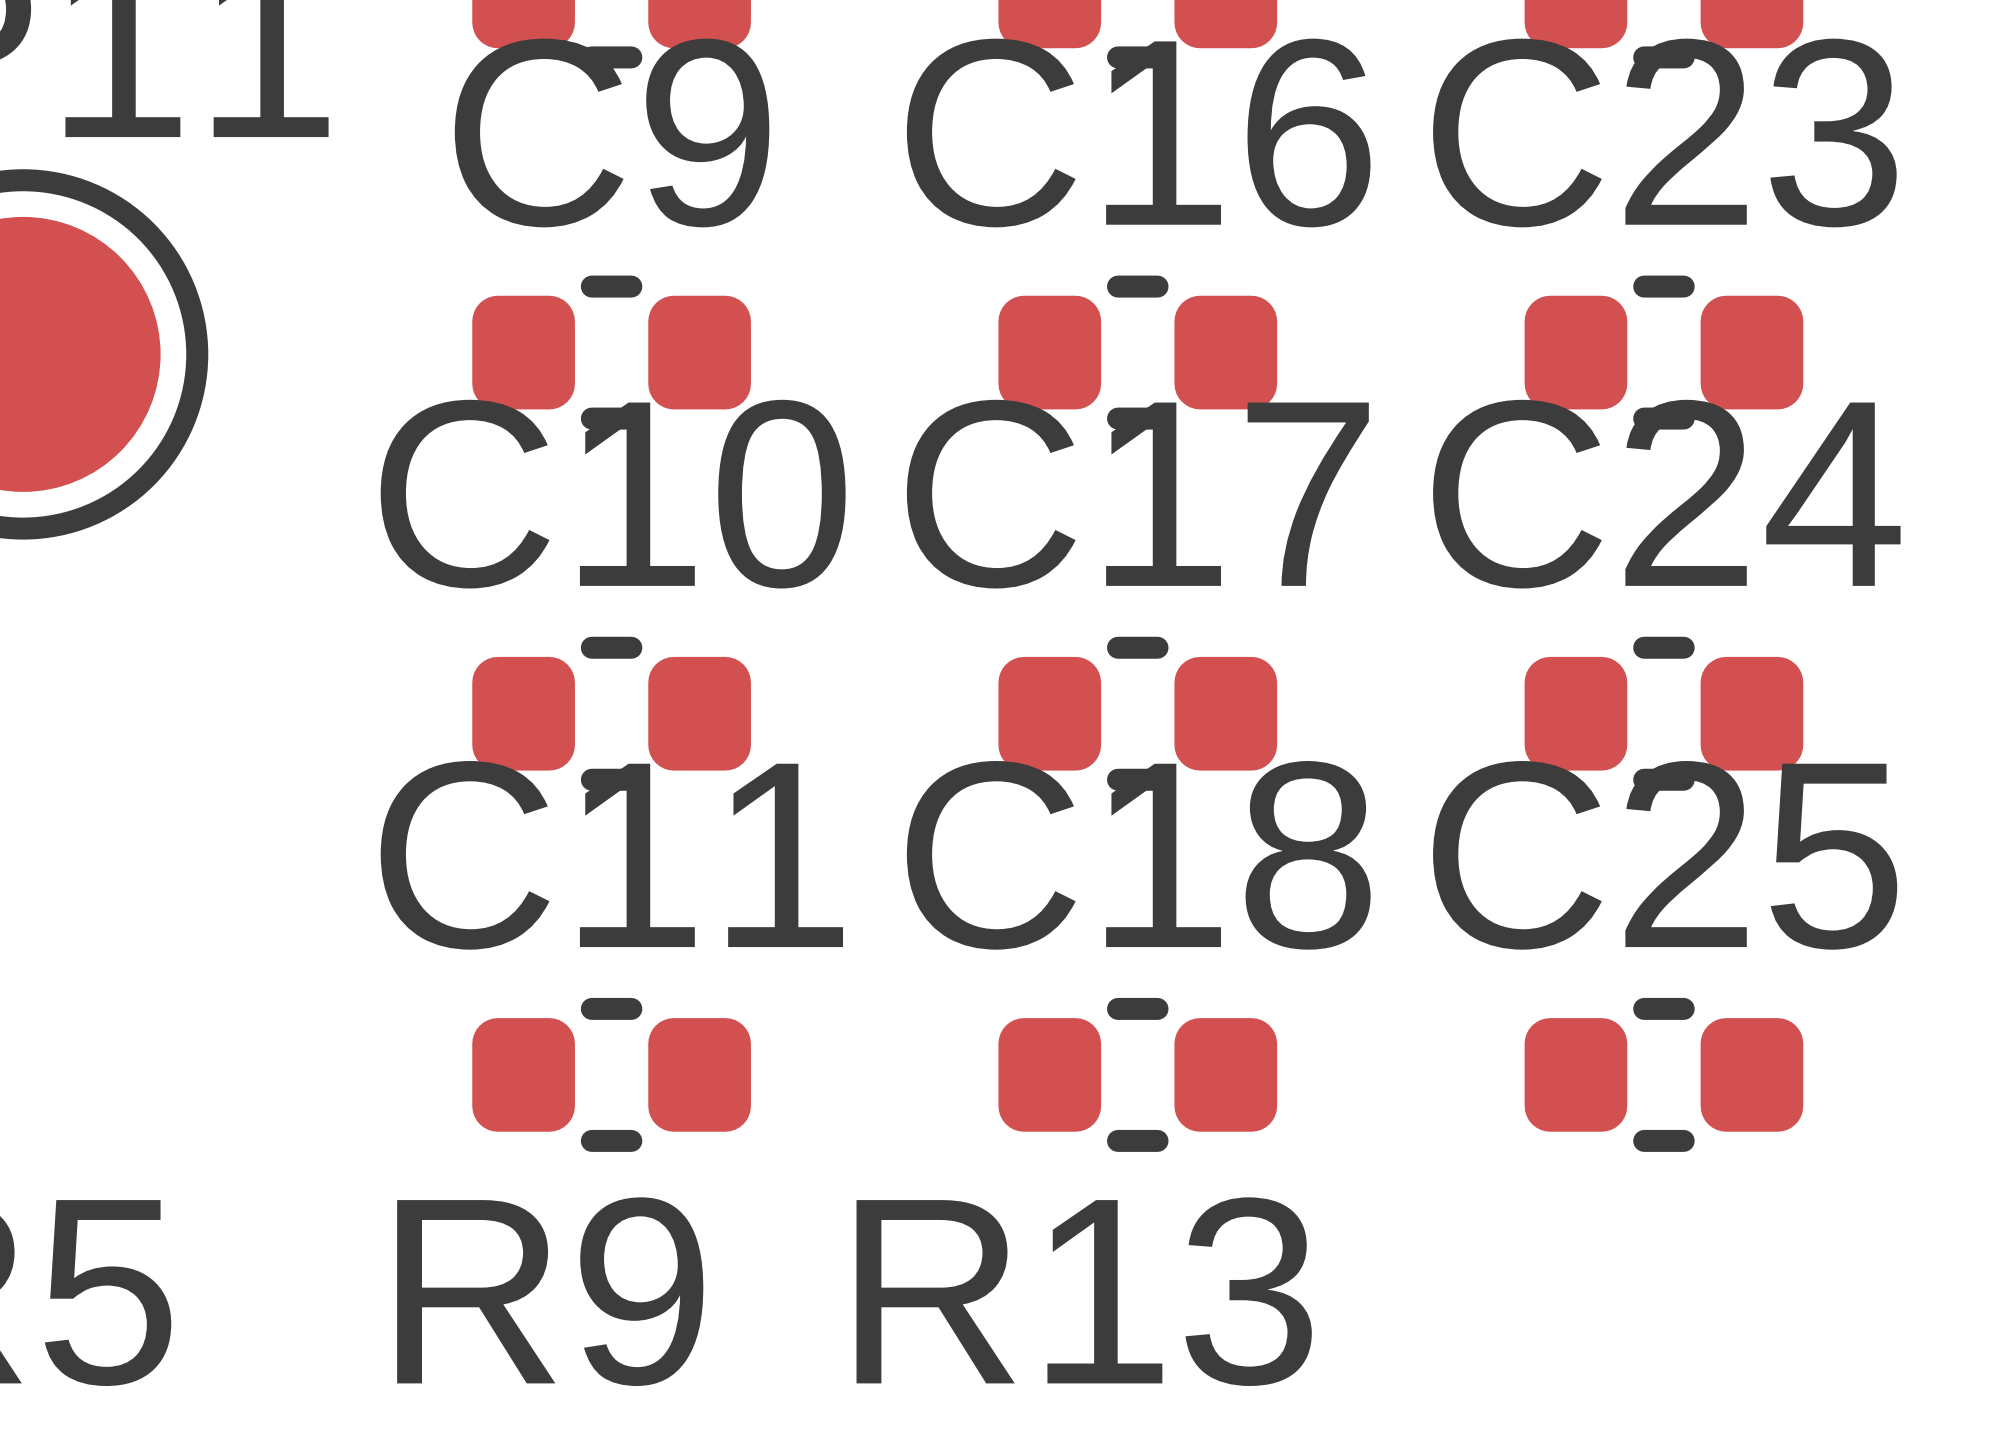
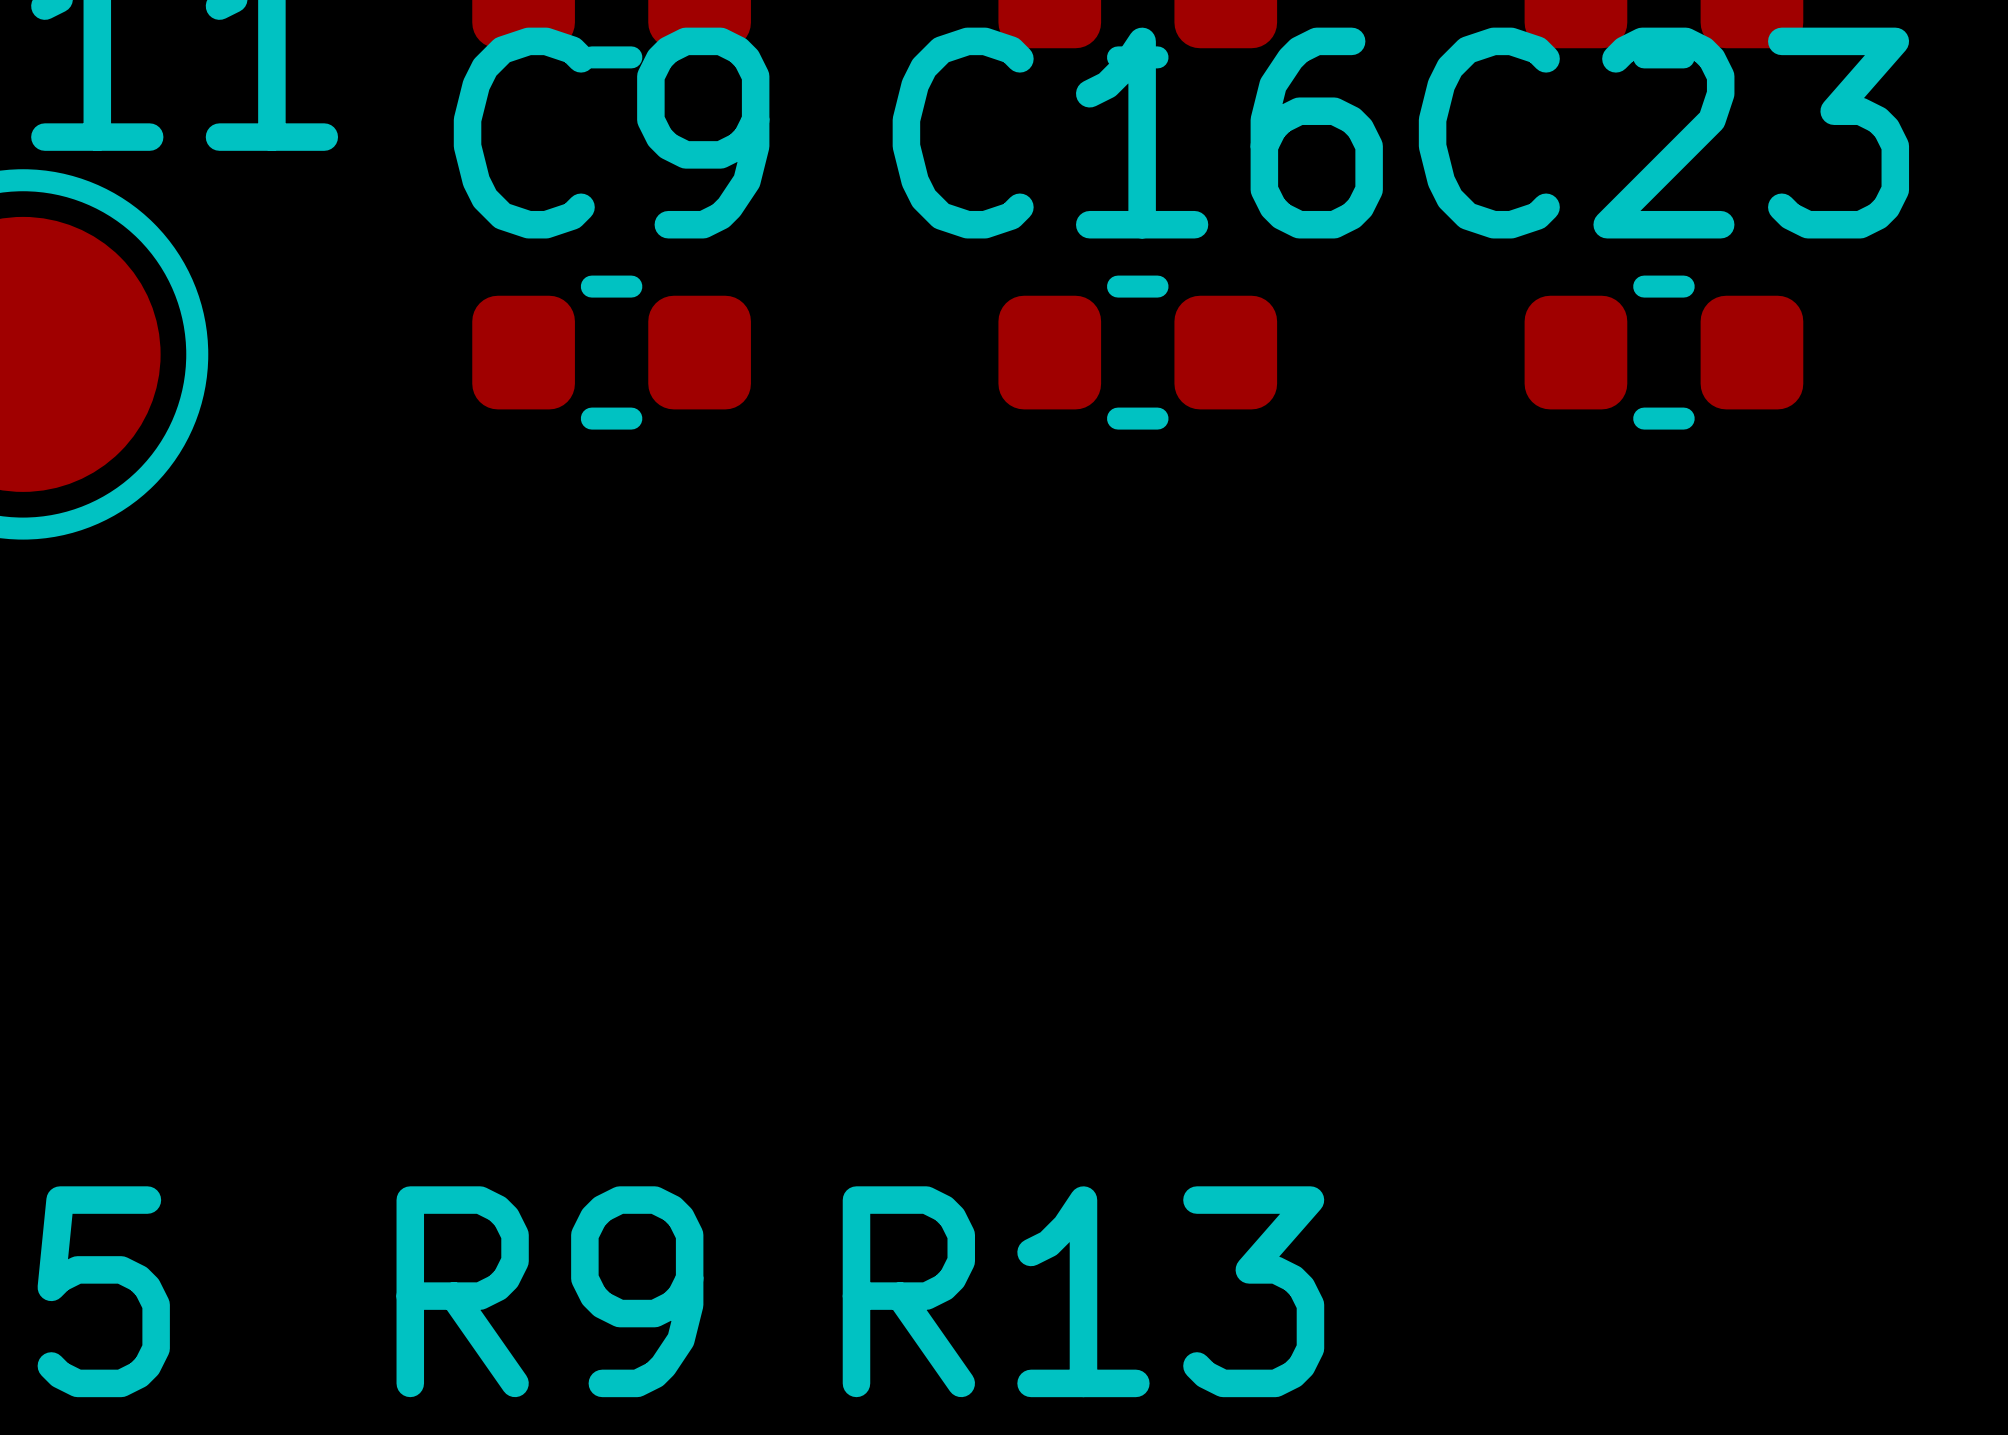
C10: (611, 713) -> none
C17: (1137, 713) -> none
C24: (1663, 713) -> none
C11: (611, 1074) -> none
C18: (1137, 1074) -> none
C25: (1663, 1074) -> none

